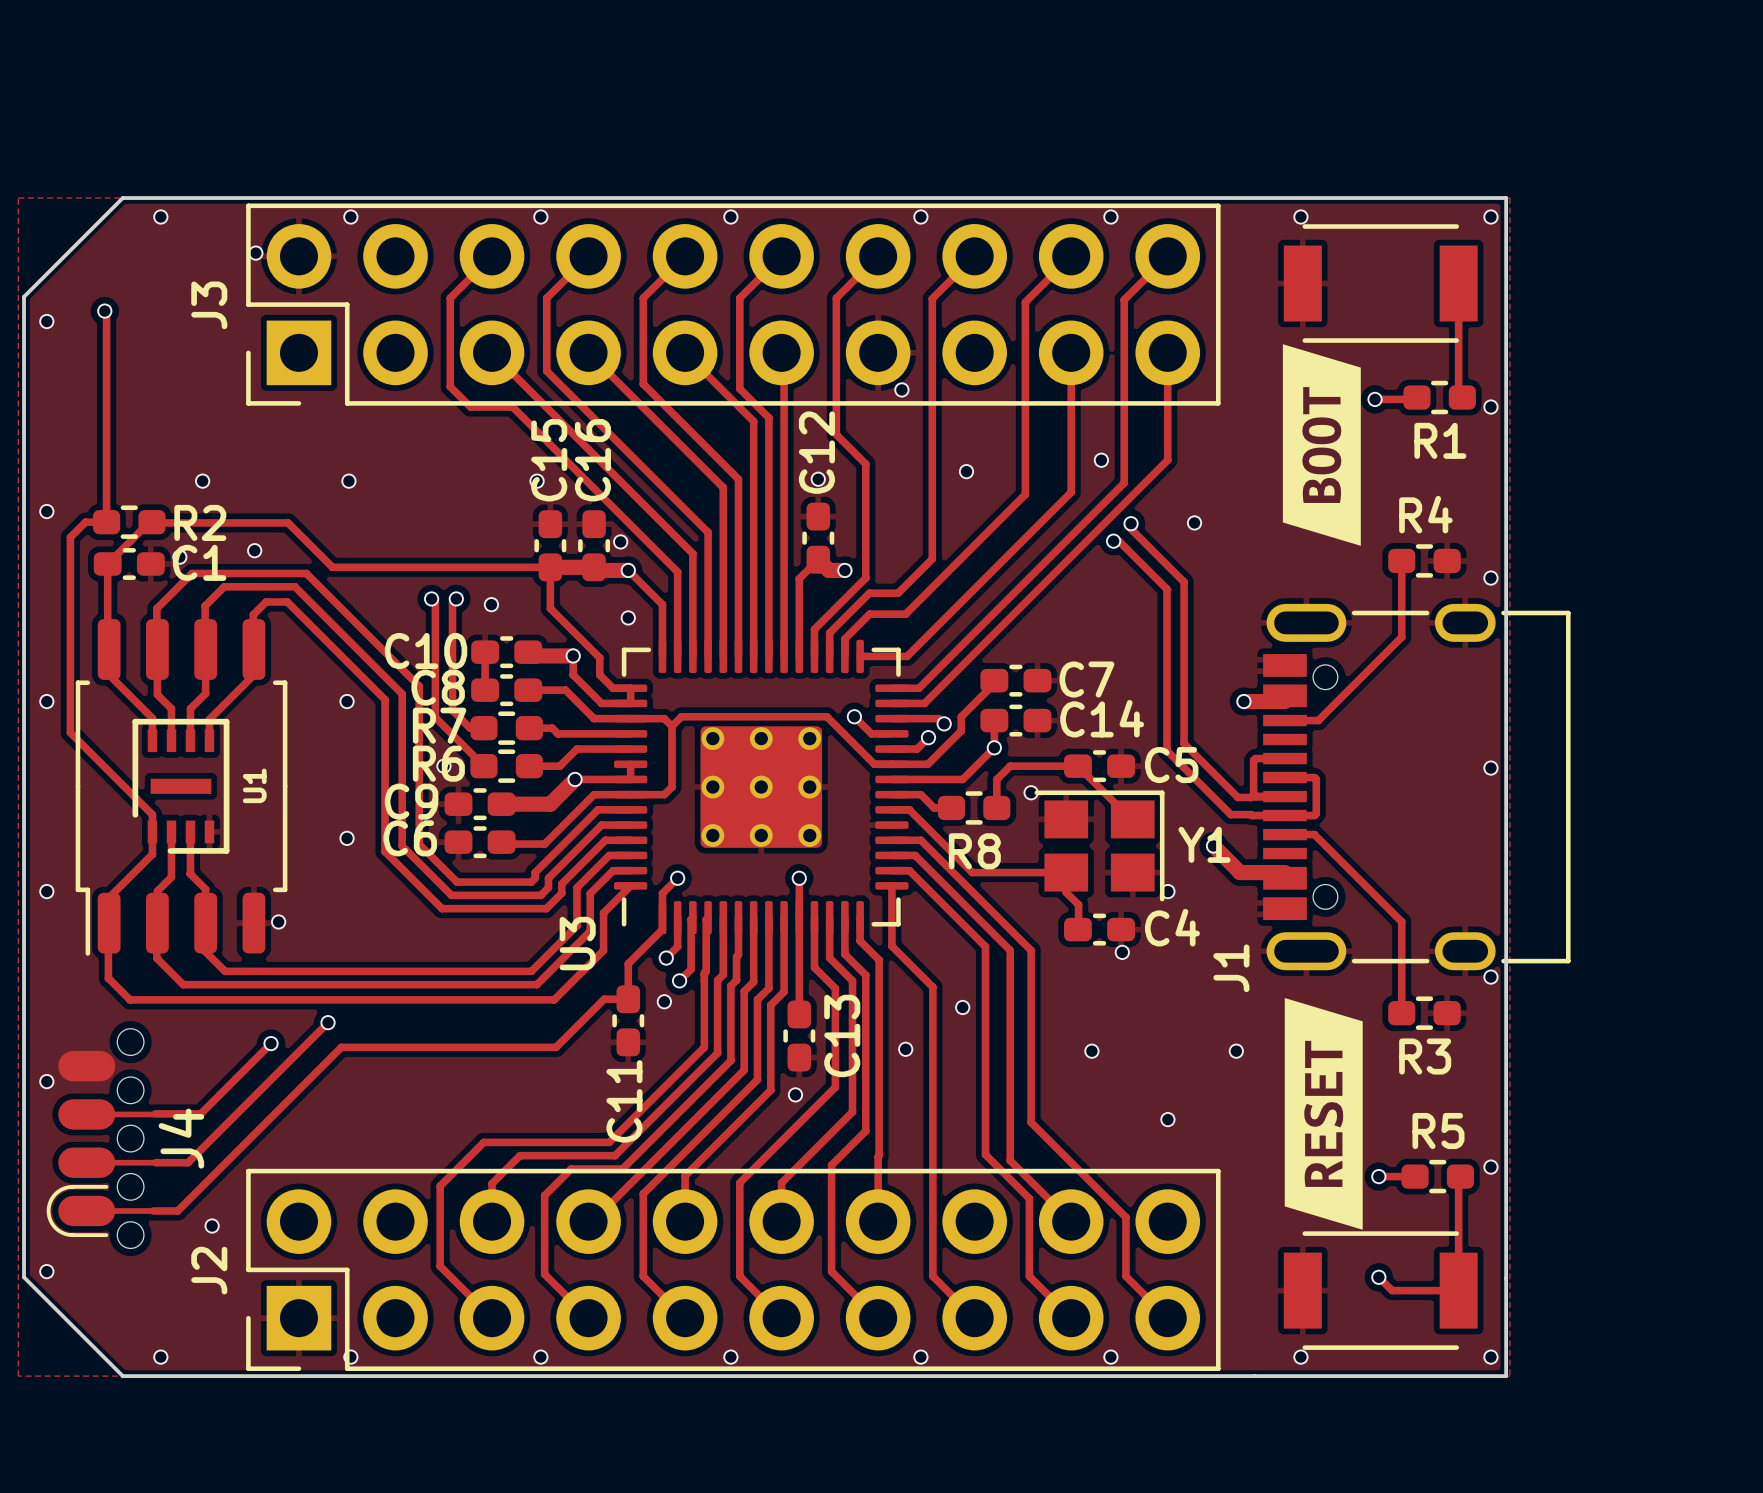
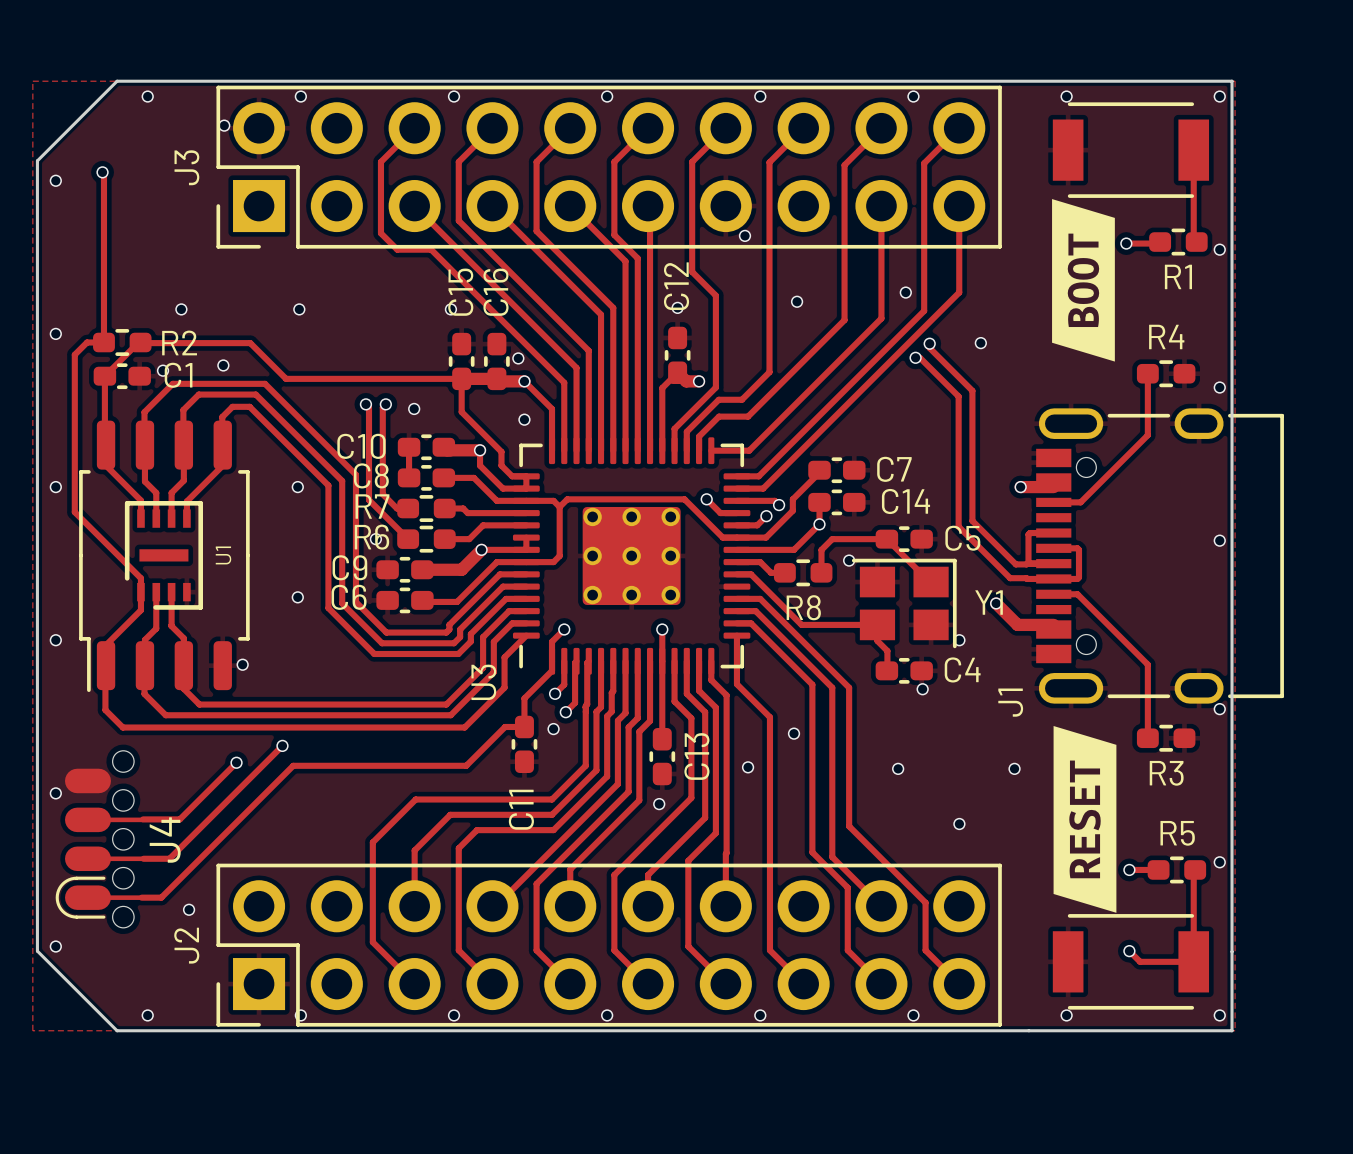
track: (662, 1089) (609, 1142) (483, 1142) (440, 1186) -> (552, 799) (415, 799) (372, 842) (372, 877)
track: (662, 1108) (614, 1155) (519, 1155) (492, 1183) -> (552, 814) (450, 814) (414, 850) (414, 875)
track: (664, 1127) (622, 1168) (571, 1168) (544, 1195) (544, 1274) (546, 1276) -> (553, 830) (476, 830) (458, 848) (458, 950)

